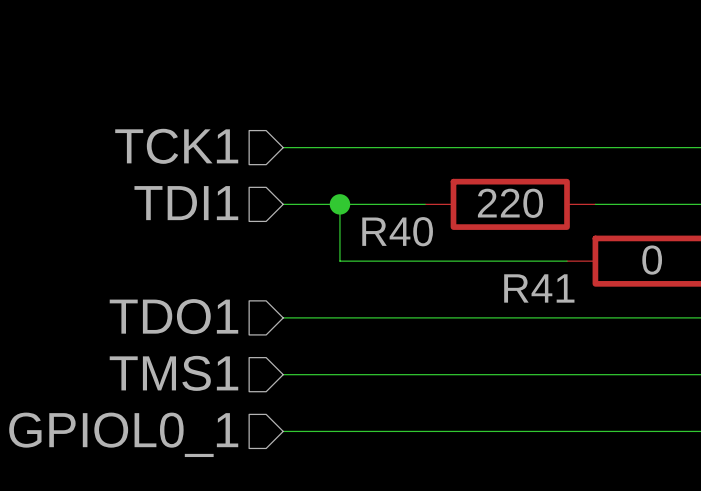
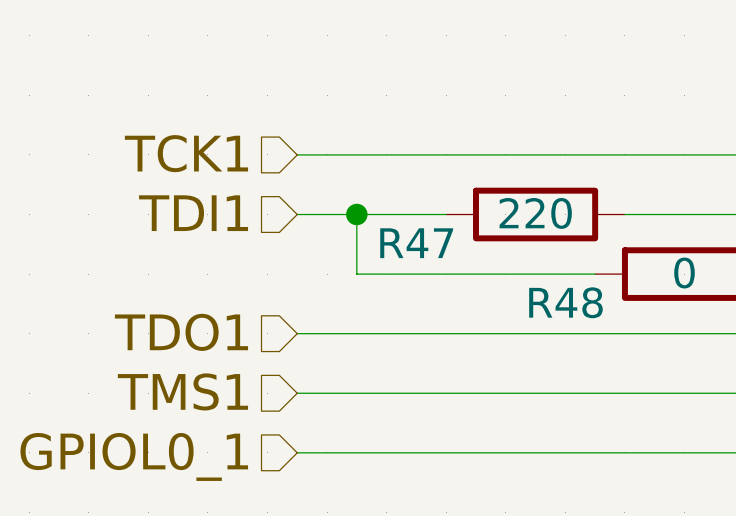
R40 name: R40 (397, 231) -> R47 (416, 243)
R41 name: R41 (539, 288) -> R48 (565, 302)

